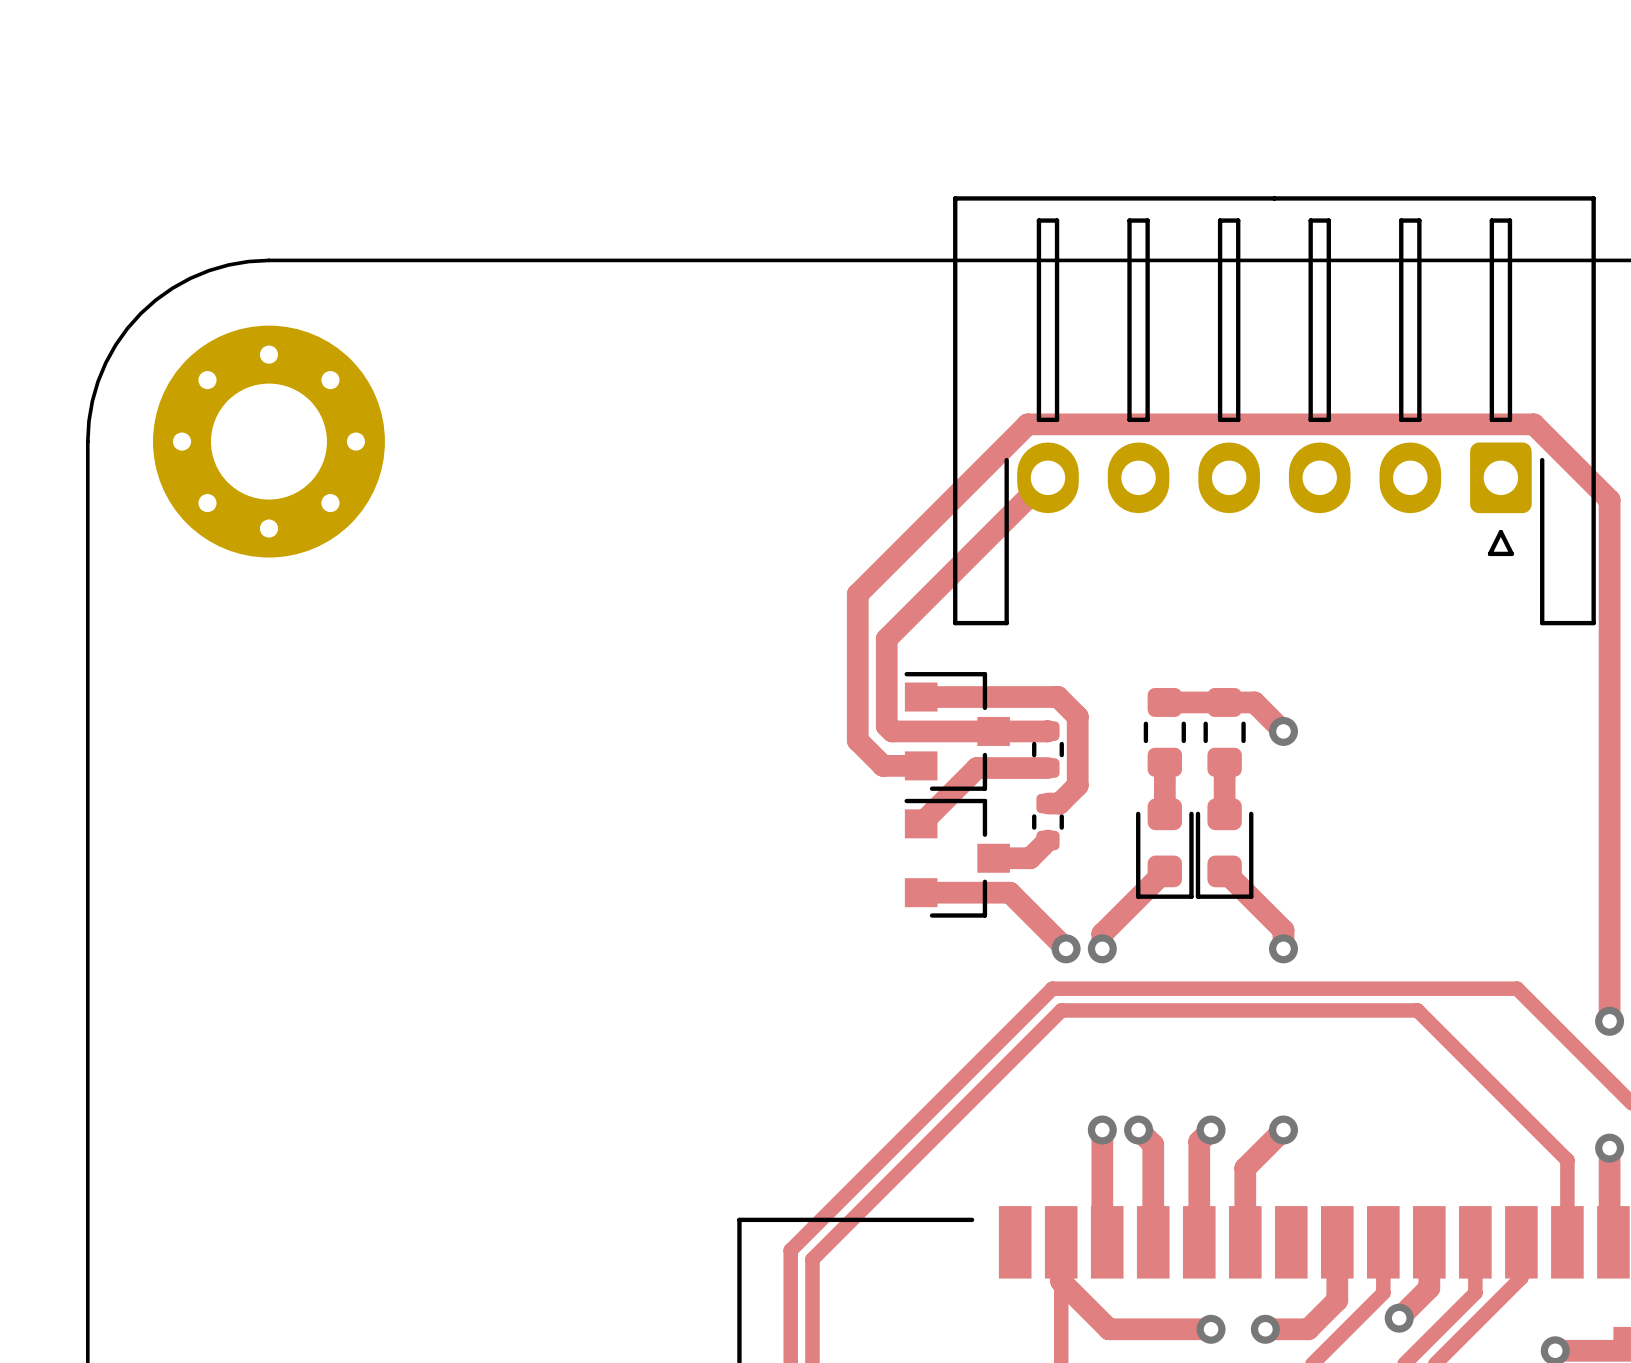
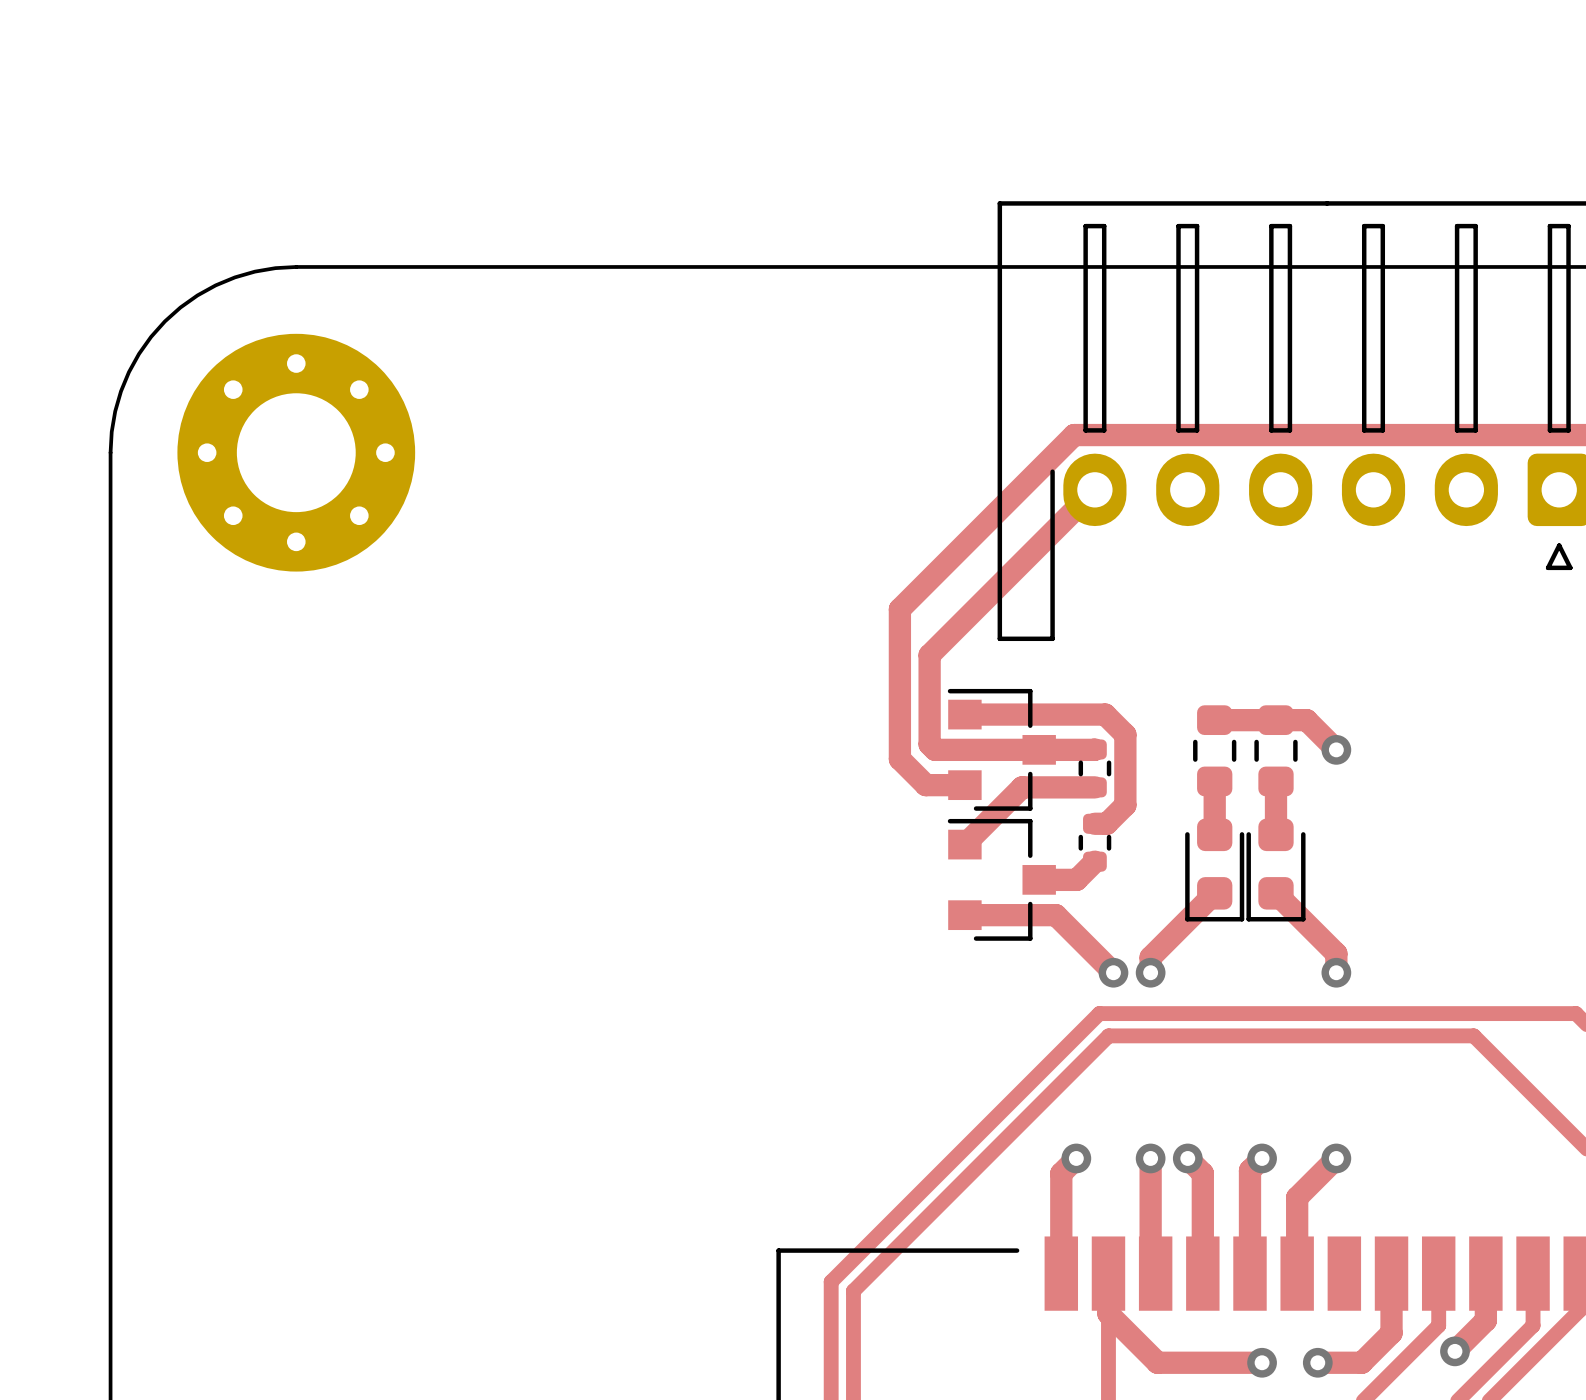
track: none -> (1076, 1158) (1061, 1173) (1061, 1273)
via: none -> (1076, 1158)

